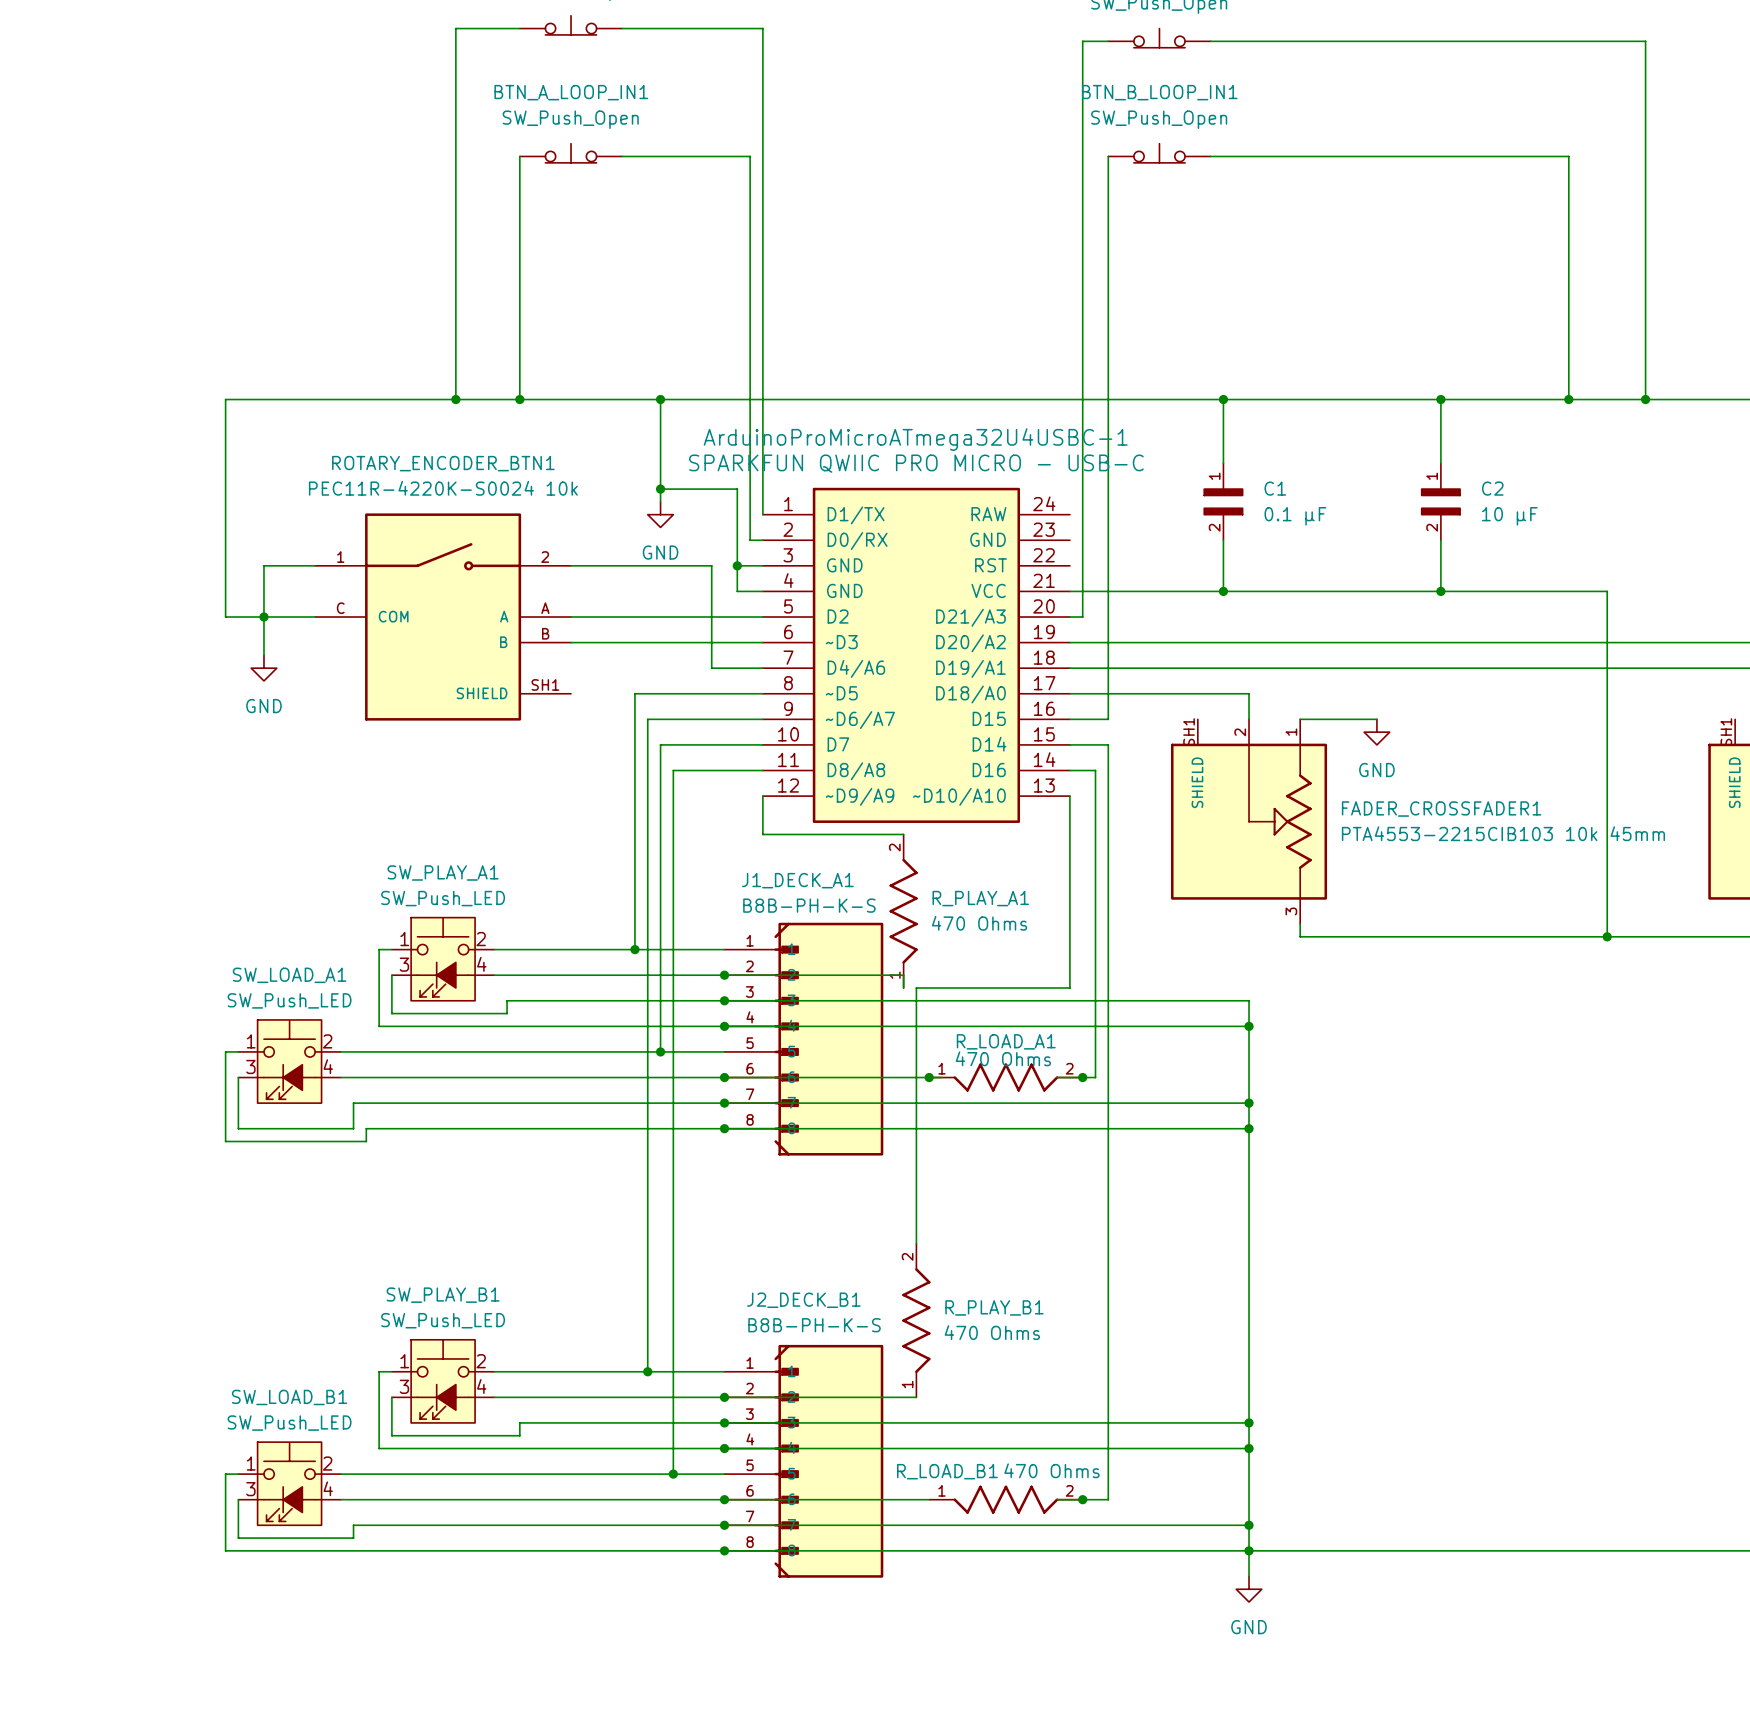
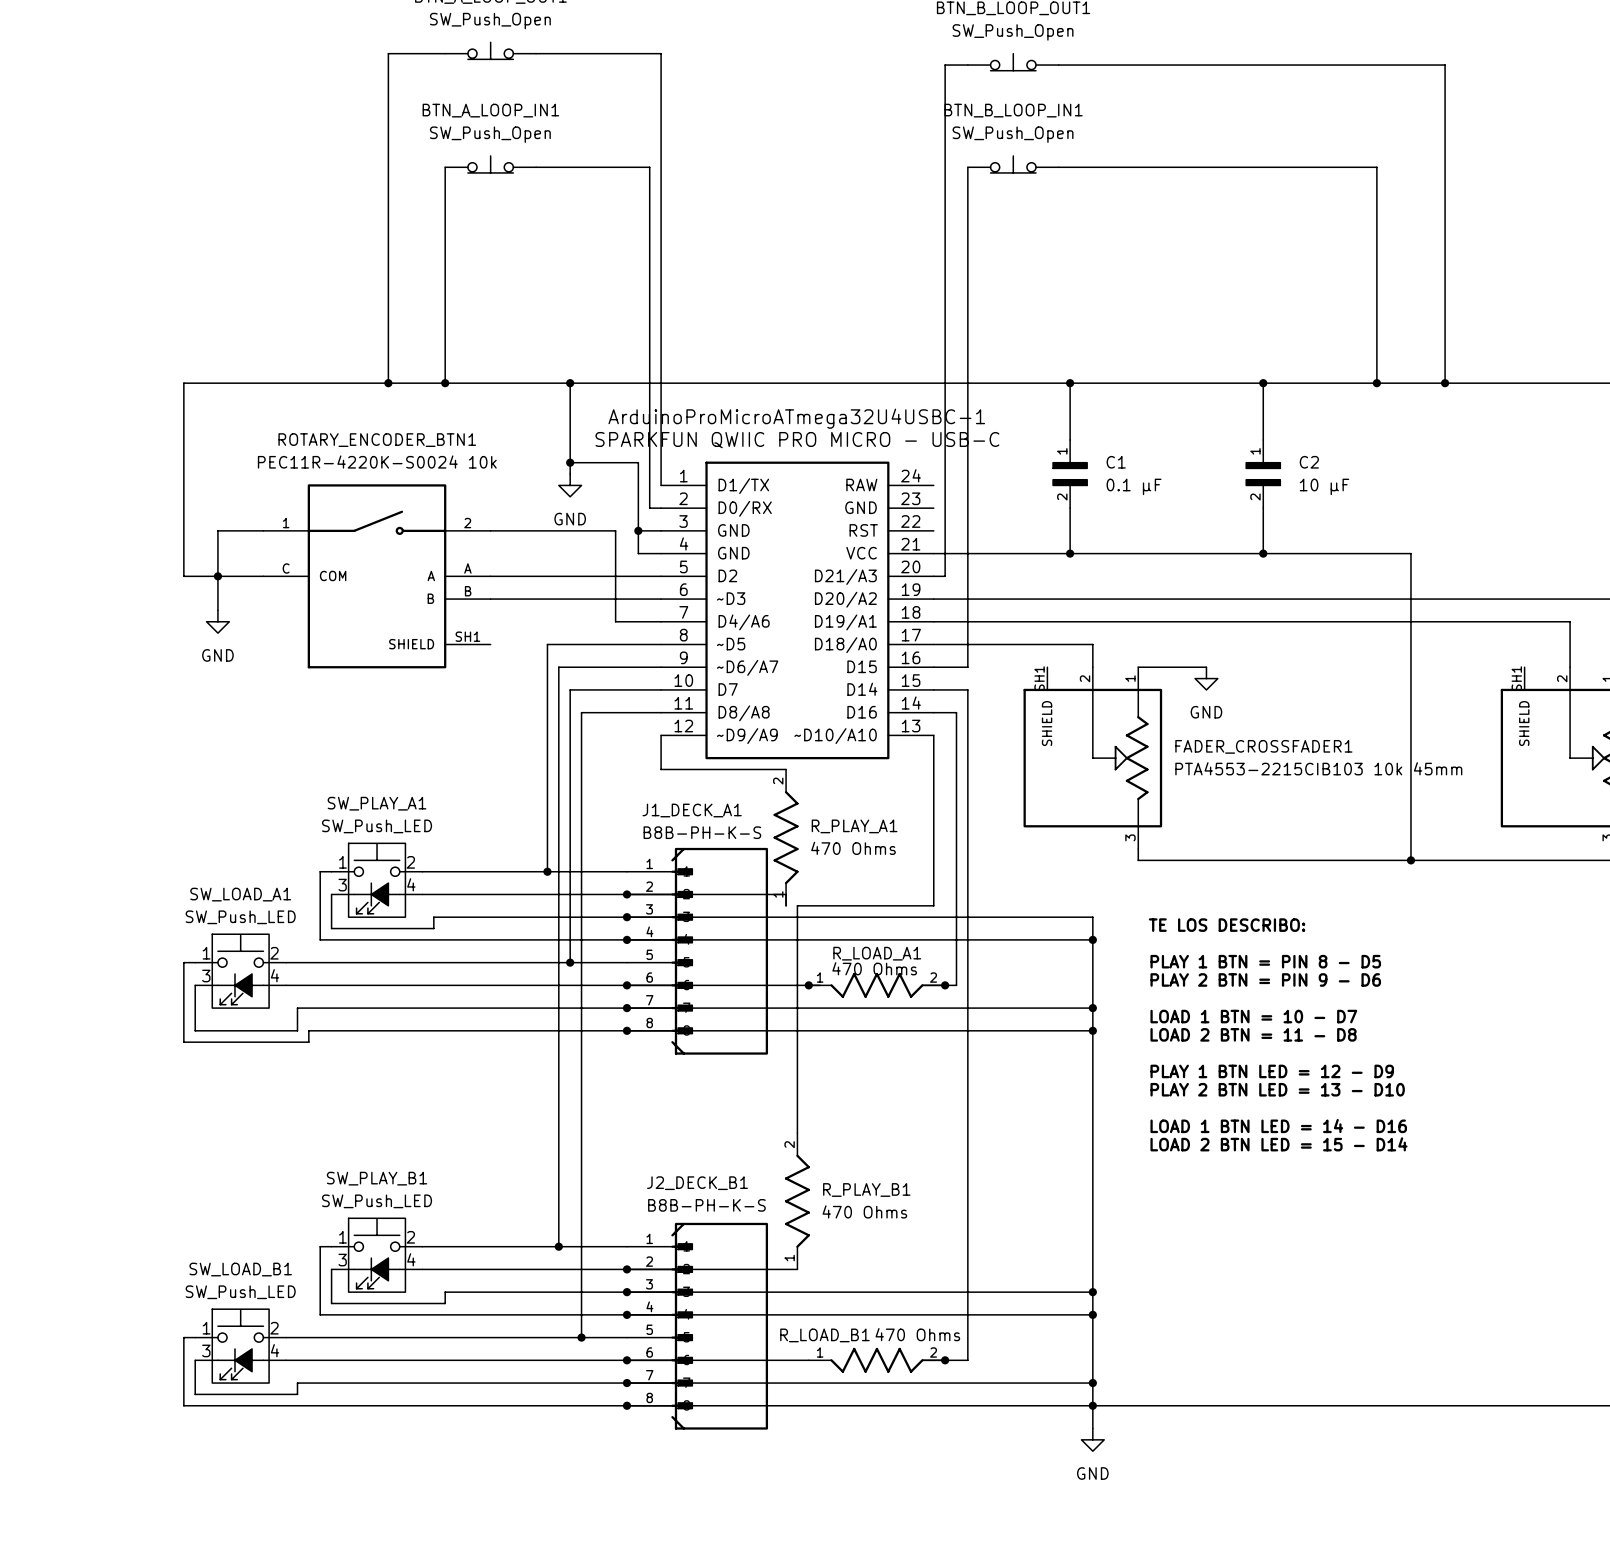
text: none -> TE LOS DESCRIBO: (1227, 925)
text: none -> PLAY 1 BTN = PIN 8 - D5 (1265, 961)
text: none -> PLAY 2 BTN = PIN 9 - D6 (1265, 979)
text: none -> LOAD 1 BTN = 10 - D7 (1253, 1016)
text: none -> LOAD 2 BTN = 11 - D8 (1253, 1034)
text: none -> PLAY 1 BTN LED = 12 - D9 (1272, 1071)
text: none -> PLAY 2 BTN LED = 13 - D10 (1277, 1089)
text: none -> LOAD 1 BTN LED = 14 - D16 (1278, 1126)
text: none -> LOAD 2 BTN LED = 15 - D14 (1278, 1144)

